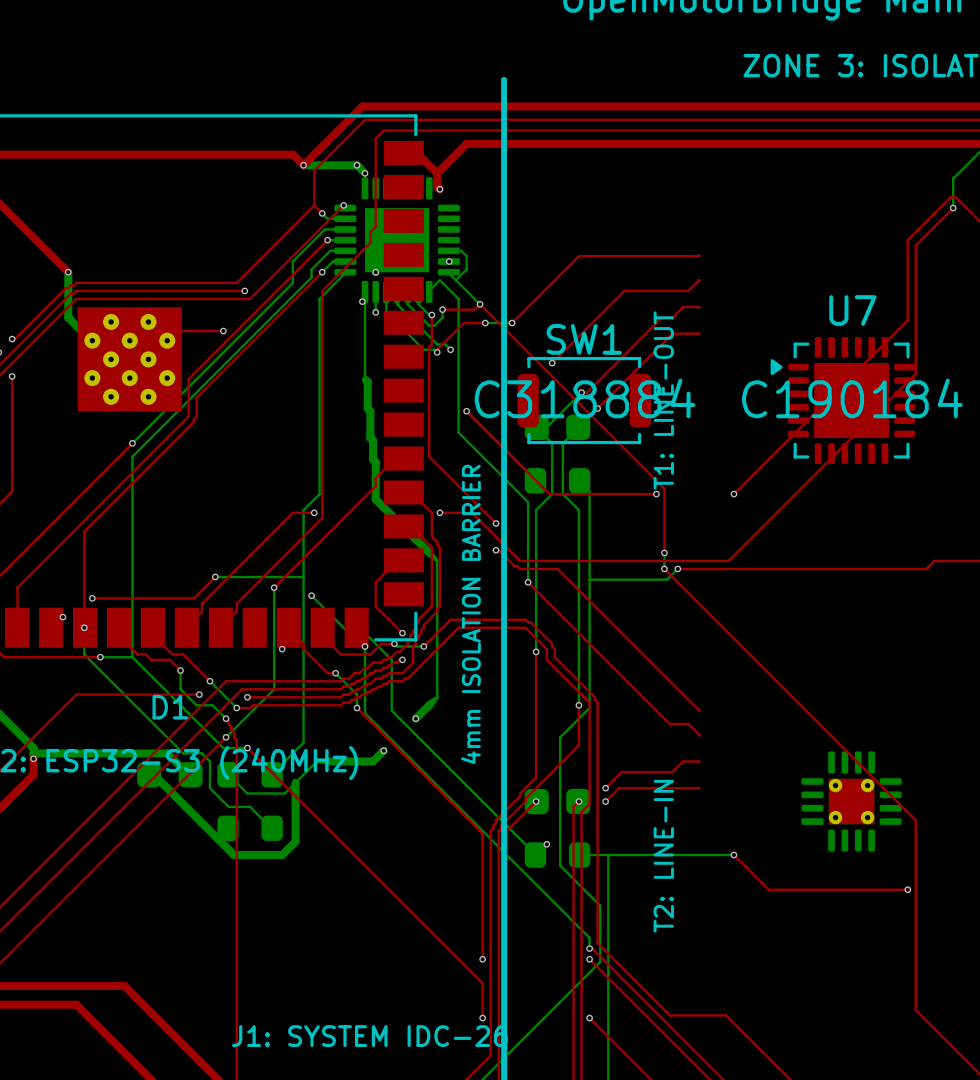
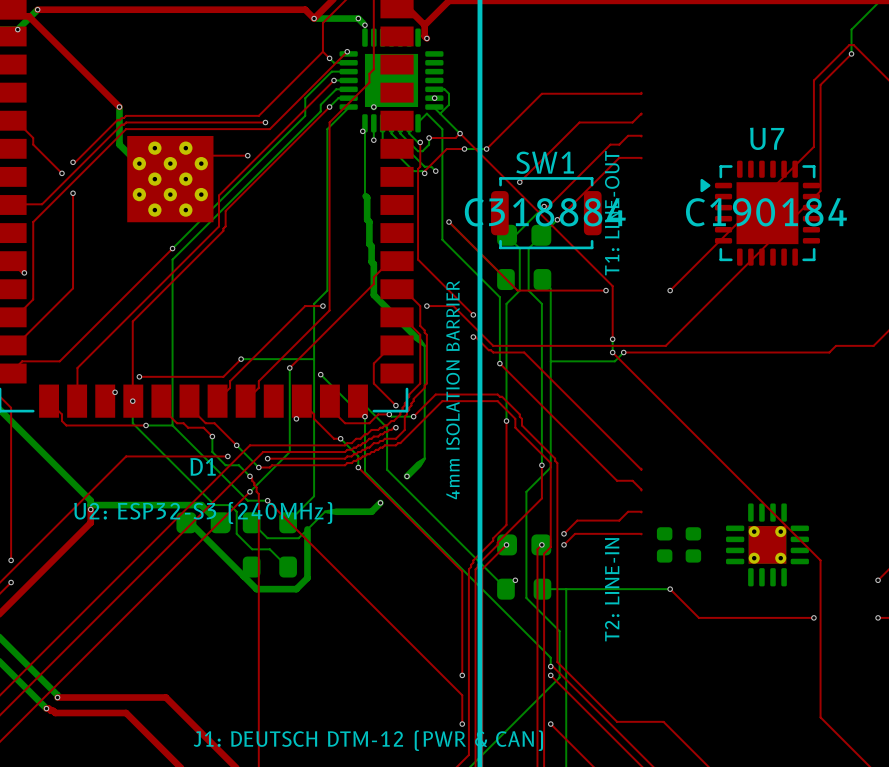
part: none -> (679, 544)
text: J1: SYSTEM IDC-26 (369, 1036) -> J1: DEUTSCH DTM-12 (PWR & CAN) (368, 740)

